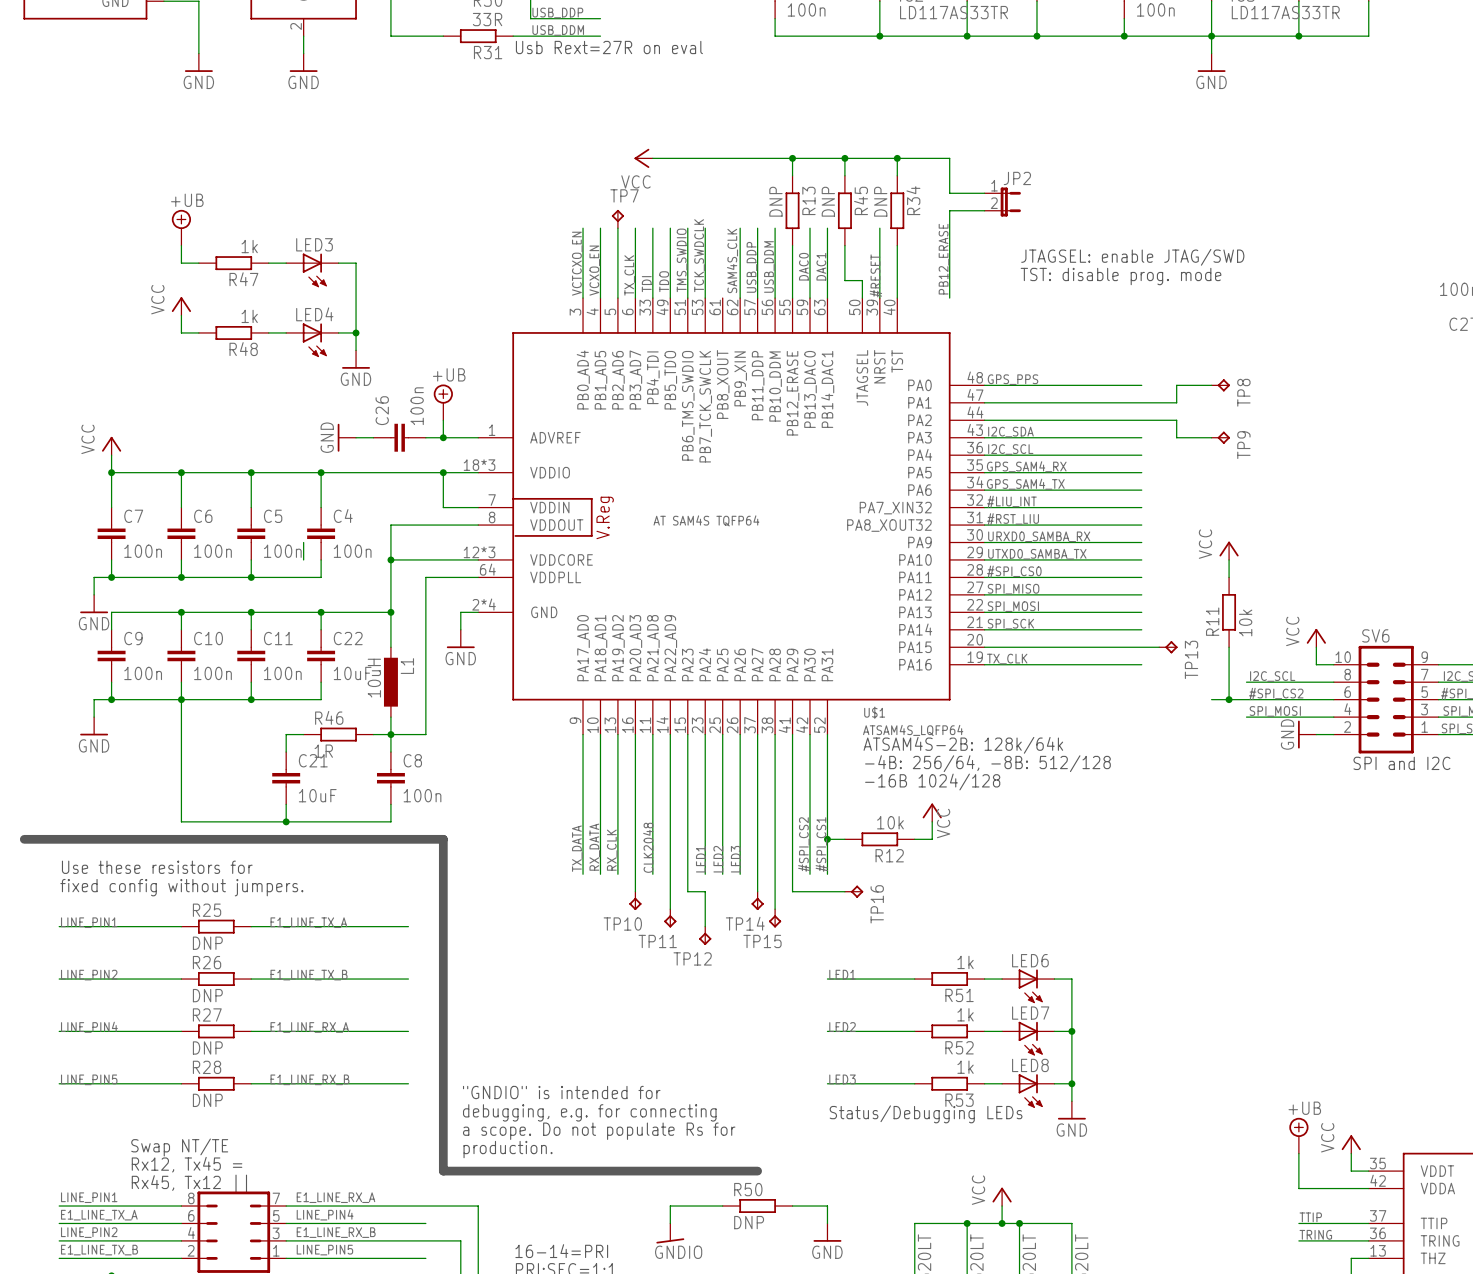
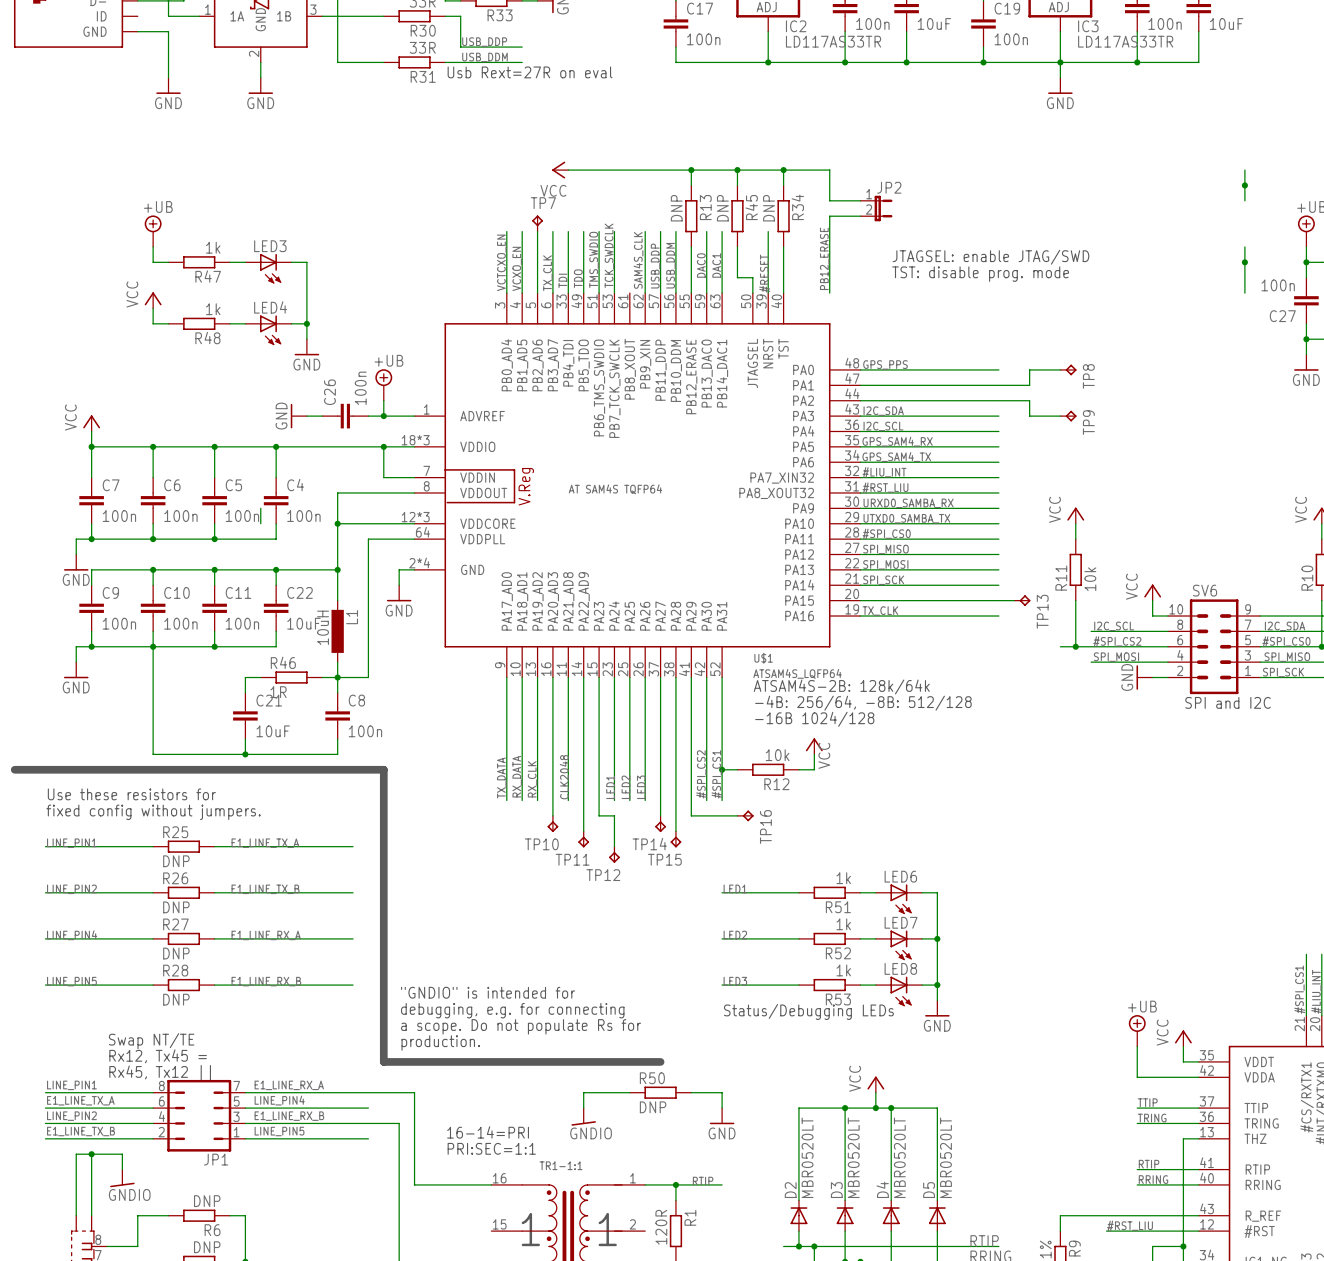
wire: none -> (1244, 170) (1244, 200)
junction: none -> (1244, 185)
wire: none -> (1244, 246) (1244, 293)
junction: none -> (1244, 262)

